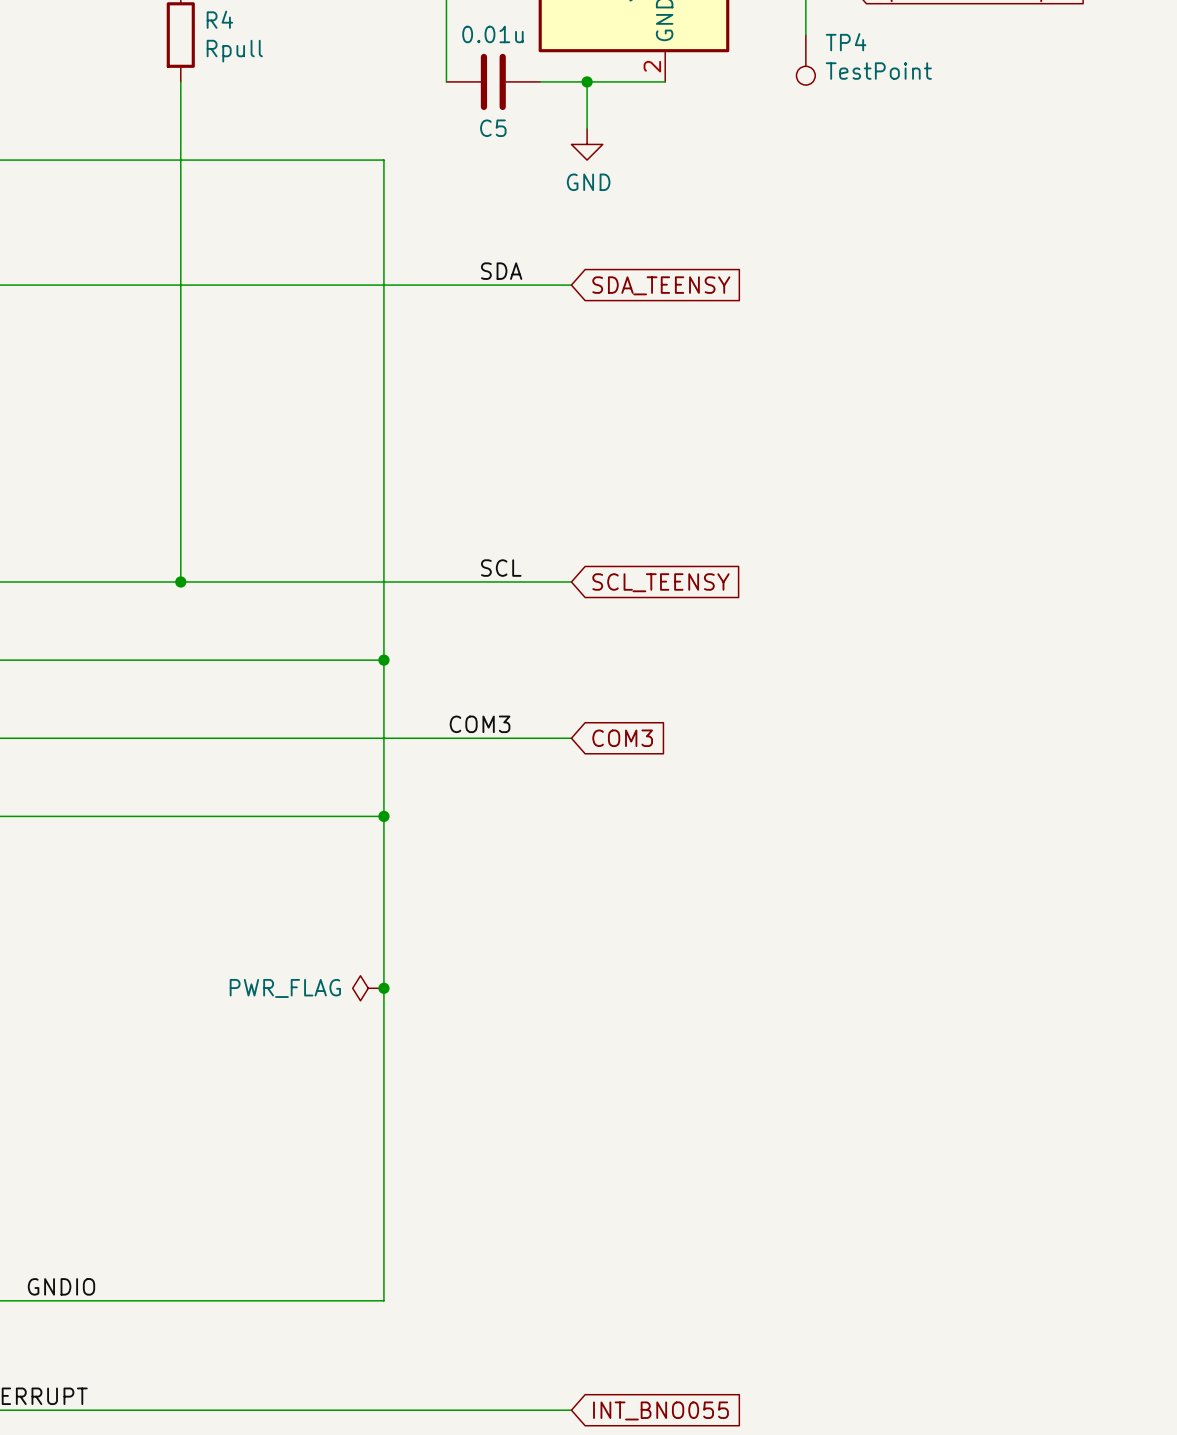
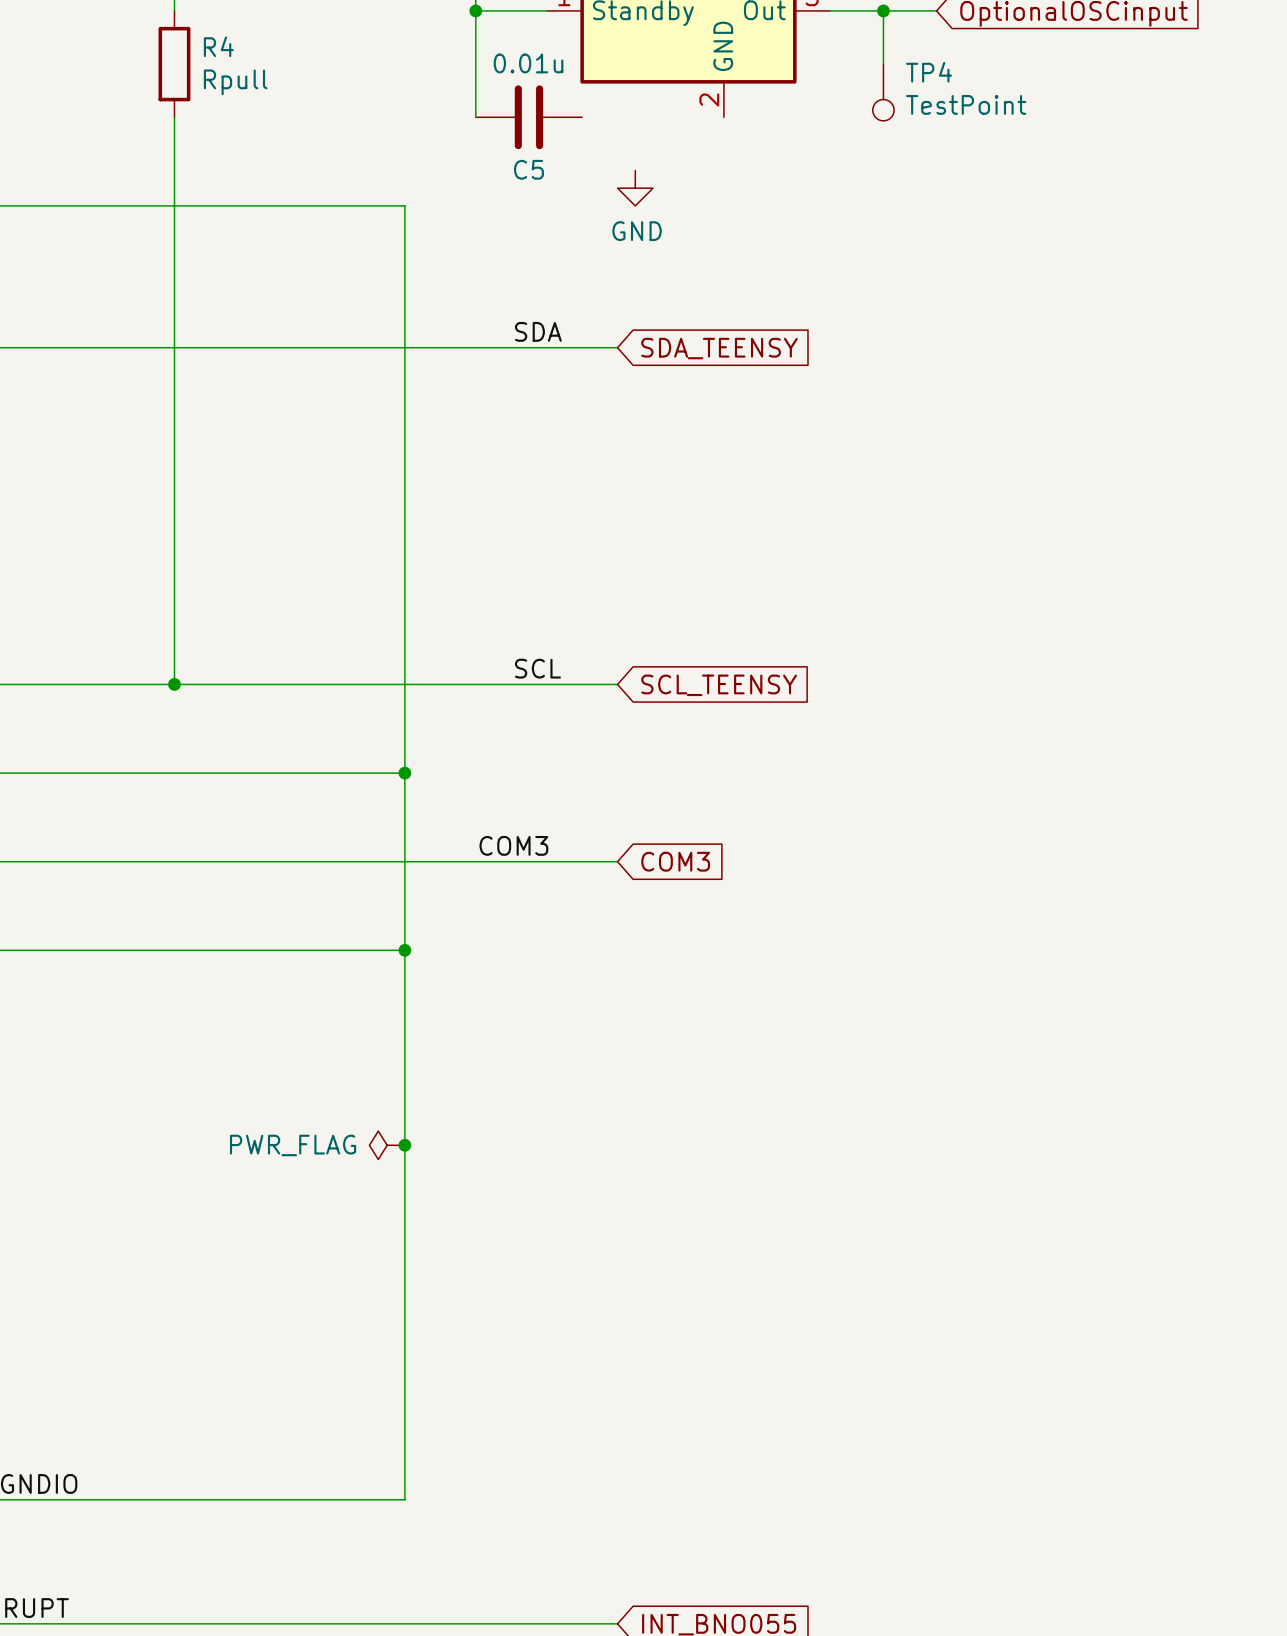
wire: (540, 81) (665, 81) -> none
wire: (587, 81) (587, 128) -> none
junction: (587, 81) -> none

